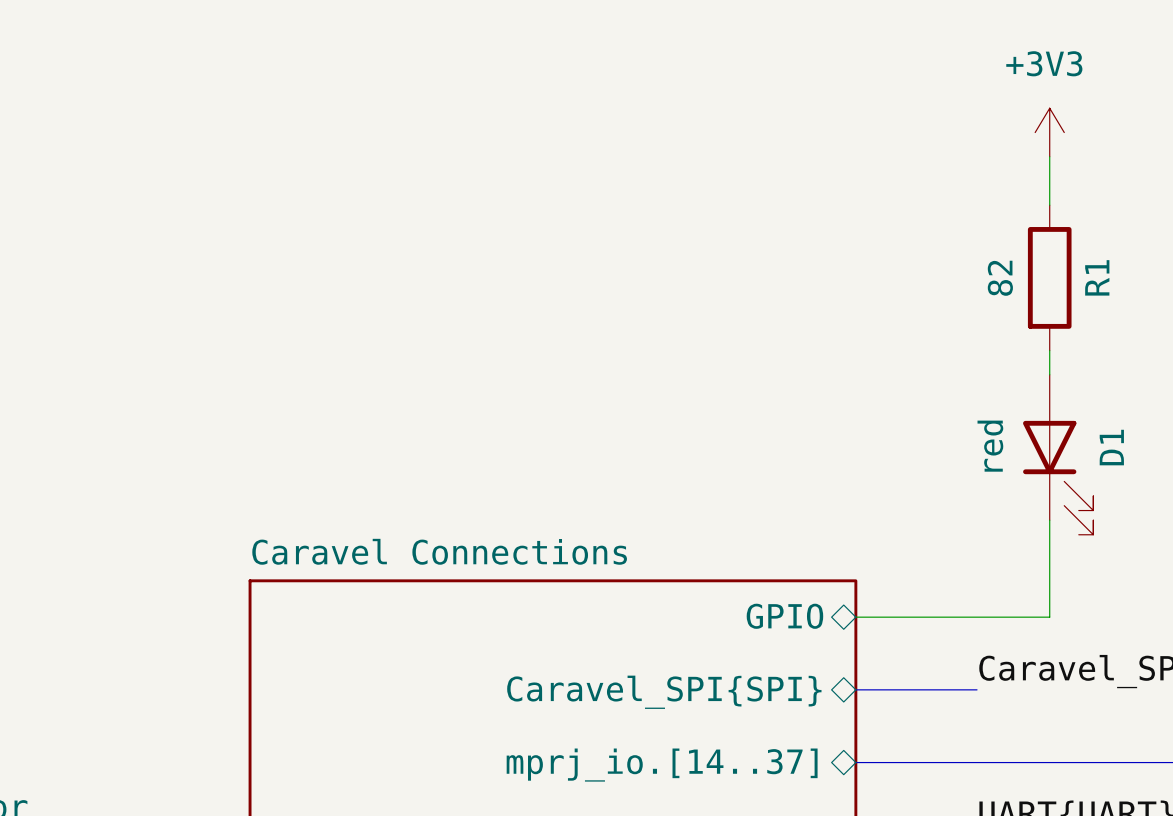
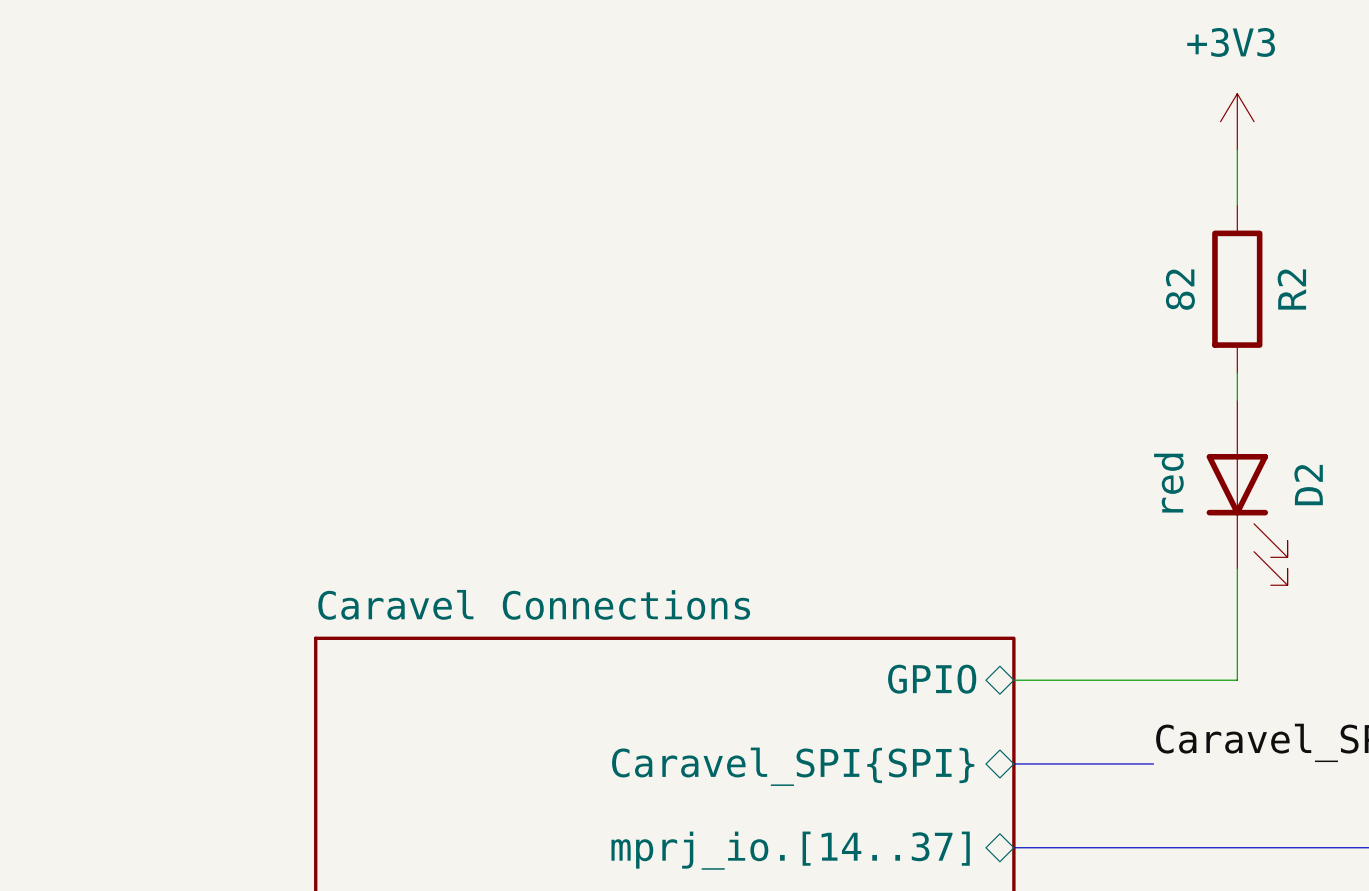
R1 name: R1 (1097, 277) -> R2 (1291, 289)
D1 name: D1 (1111, 447) -> D2 (1308, 485)

